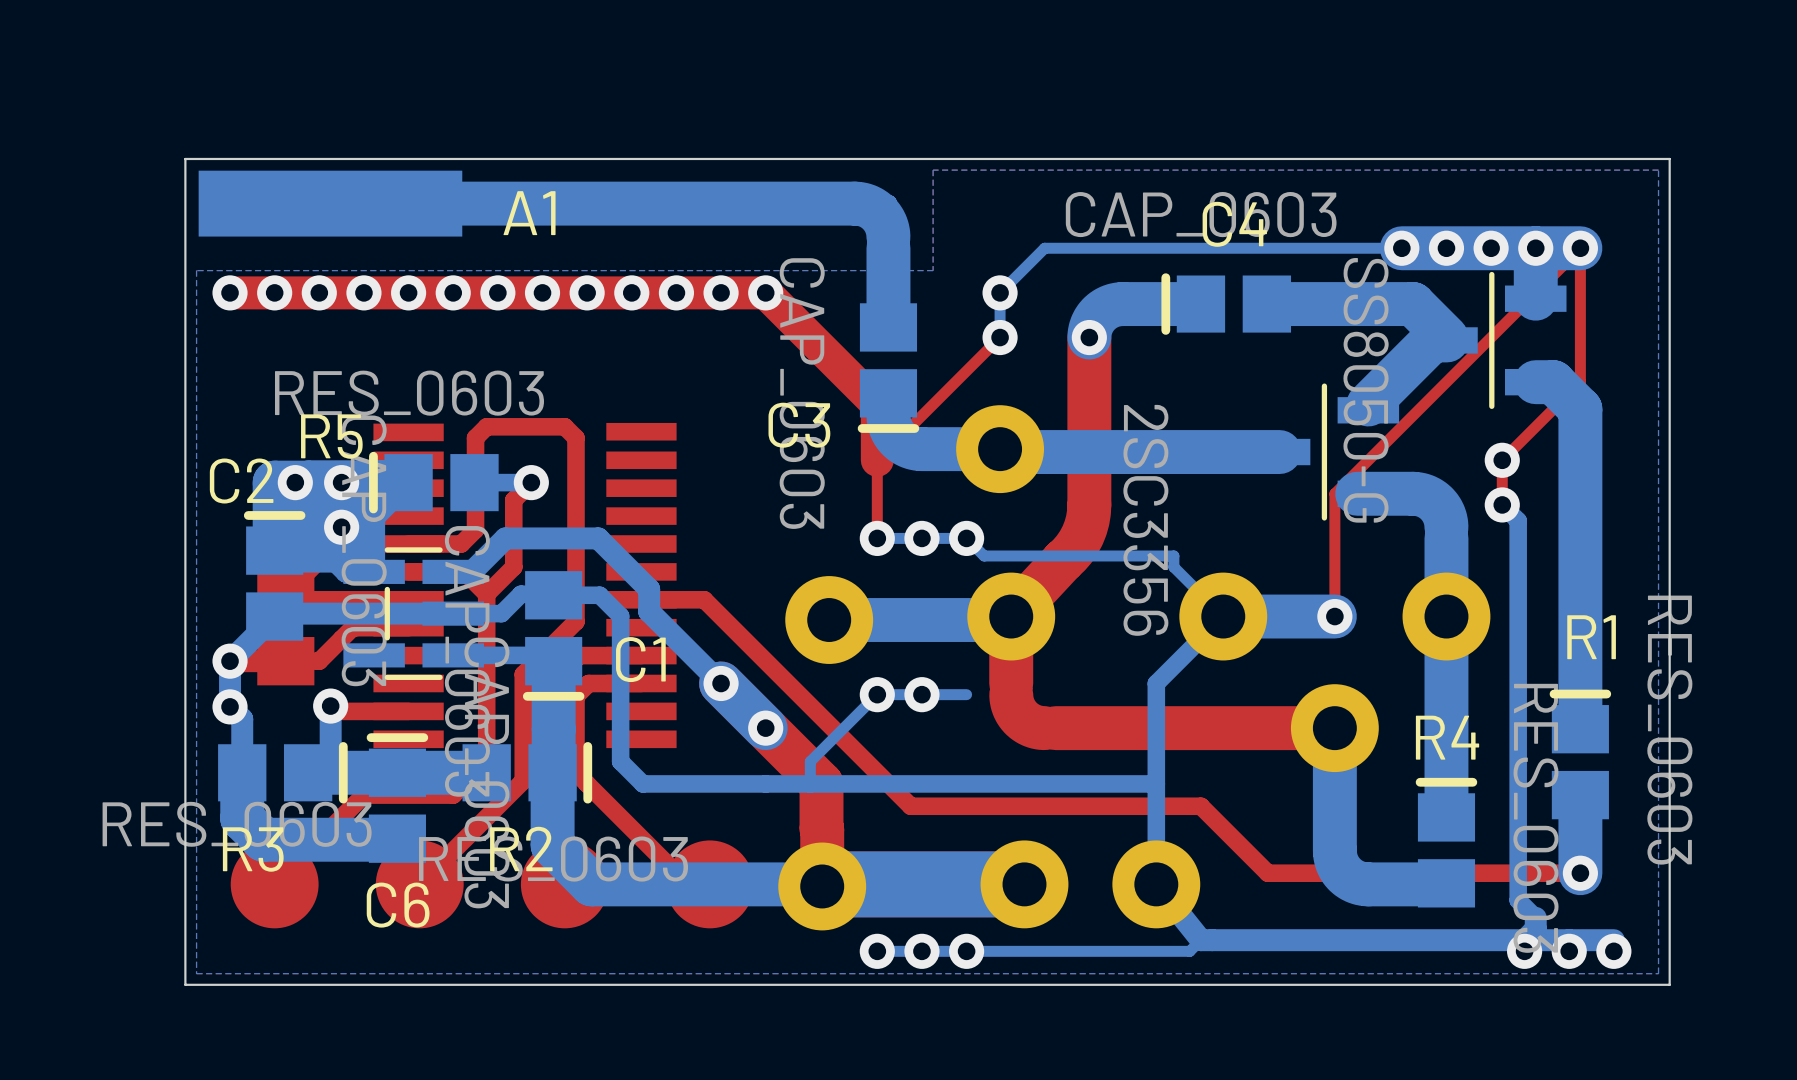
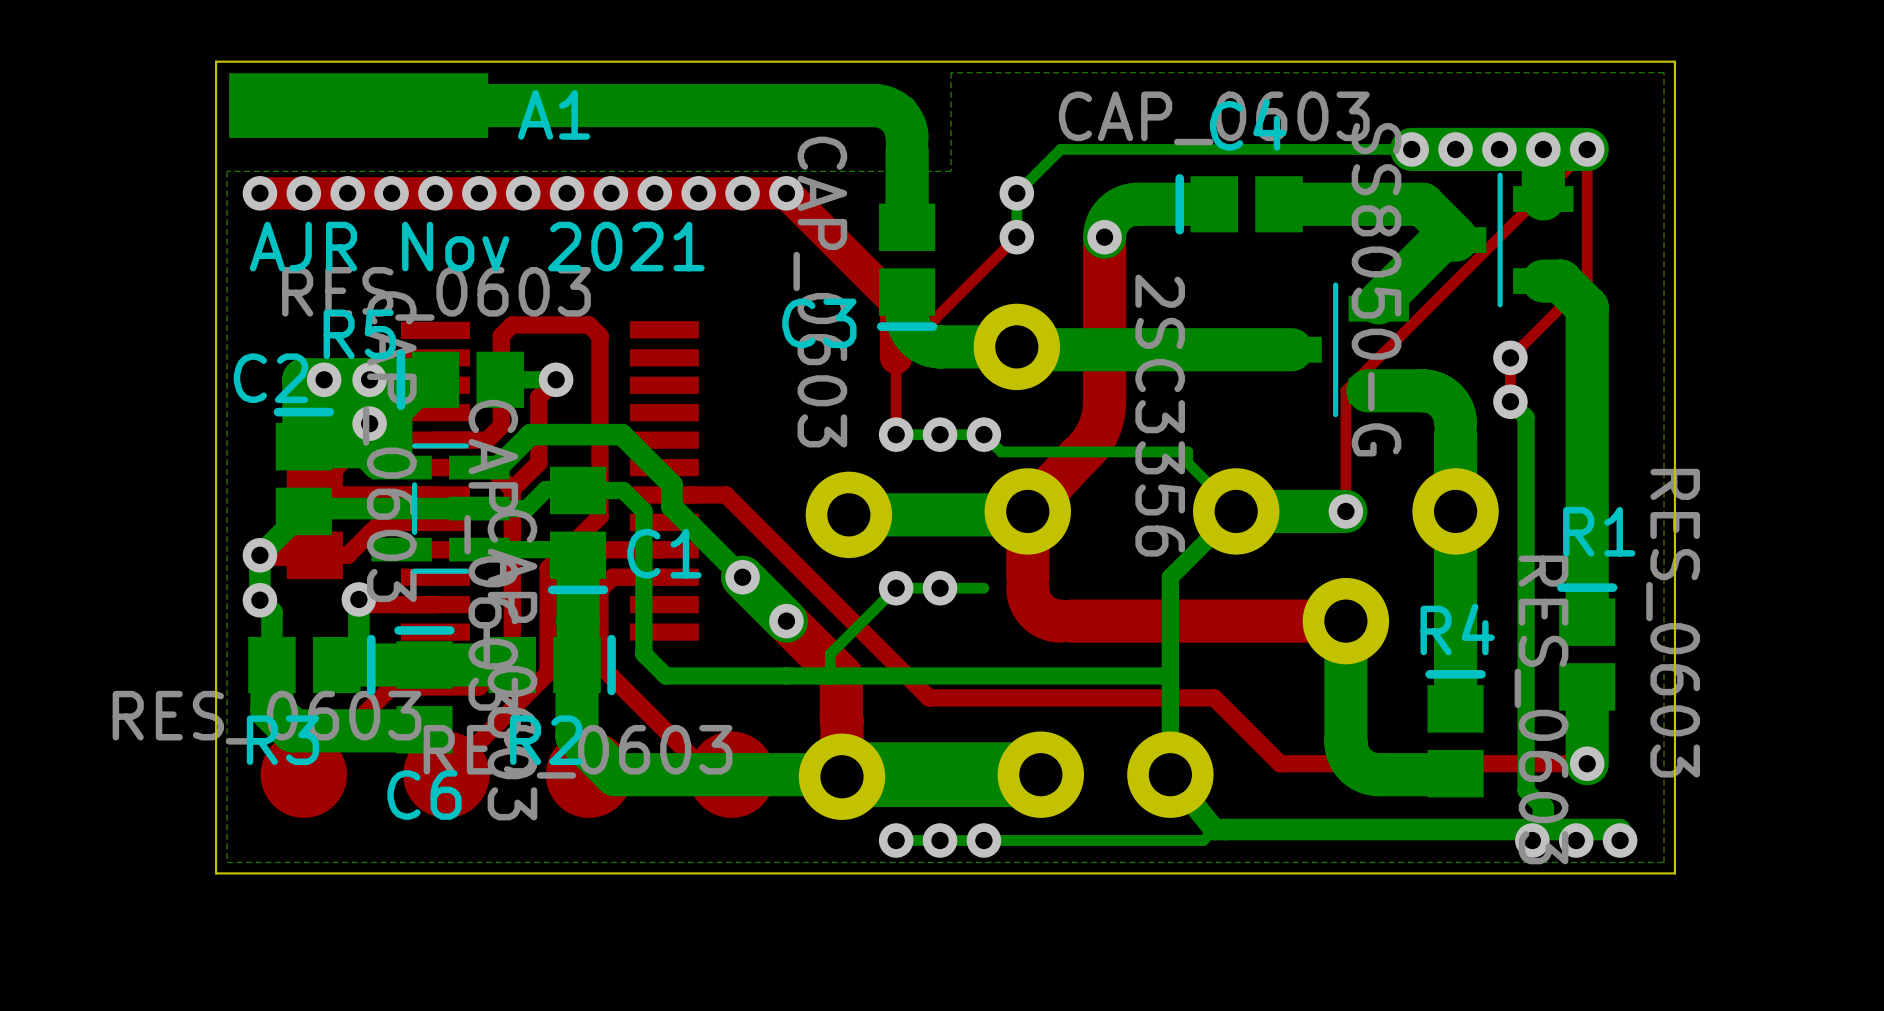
text: none -> AJR Nov 2021 (477, 246)

